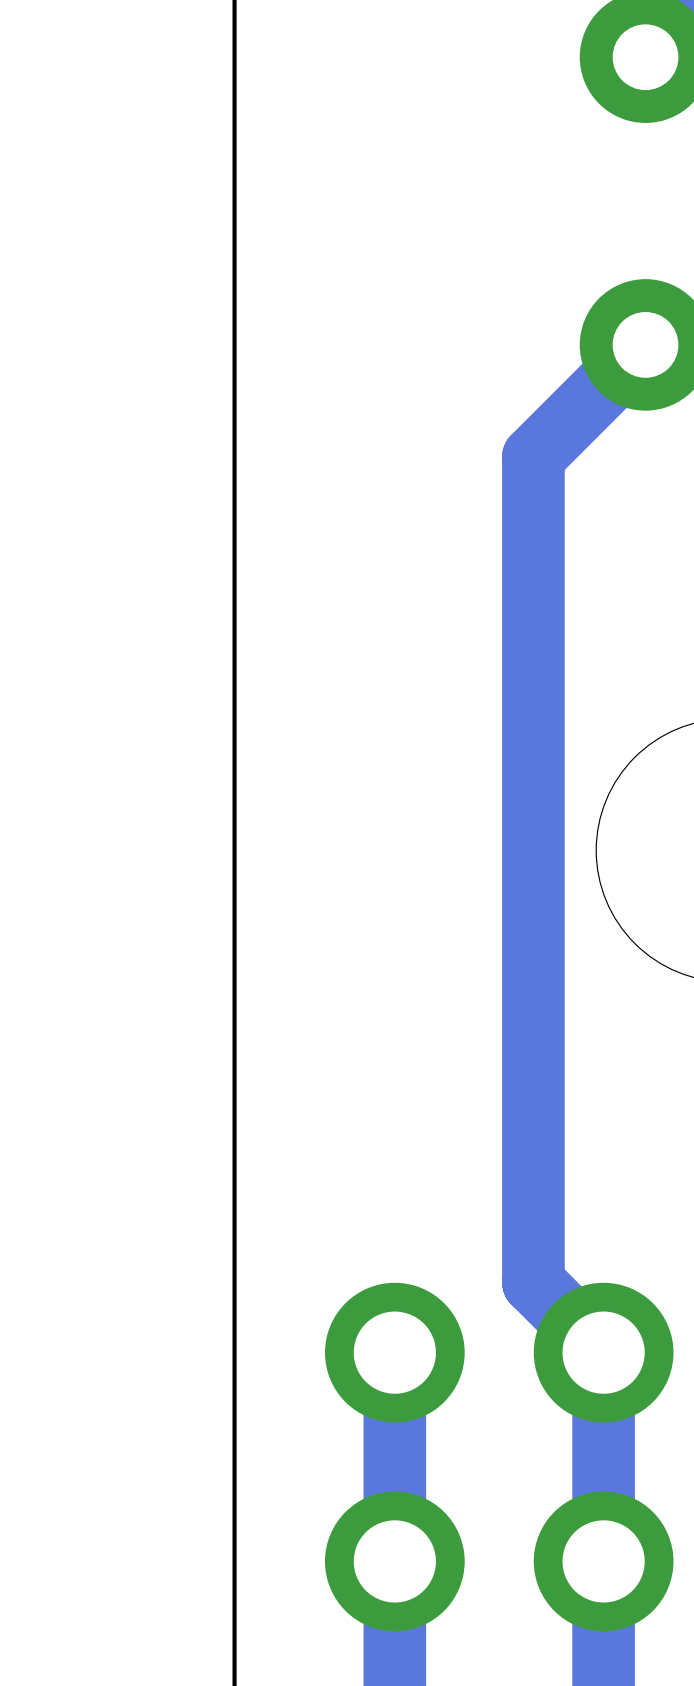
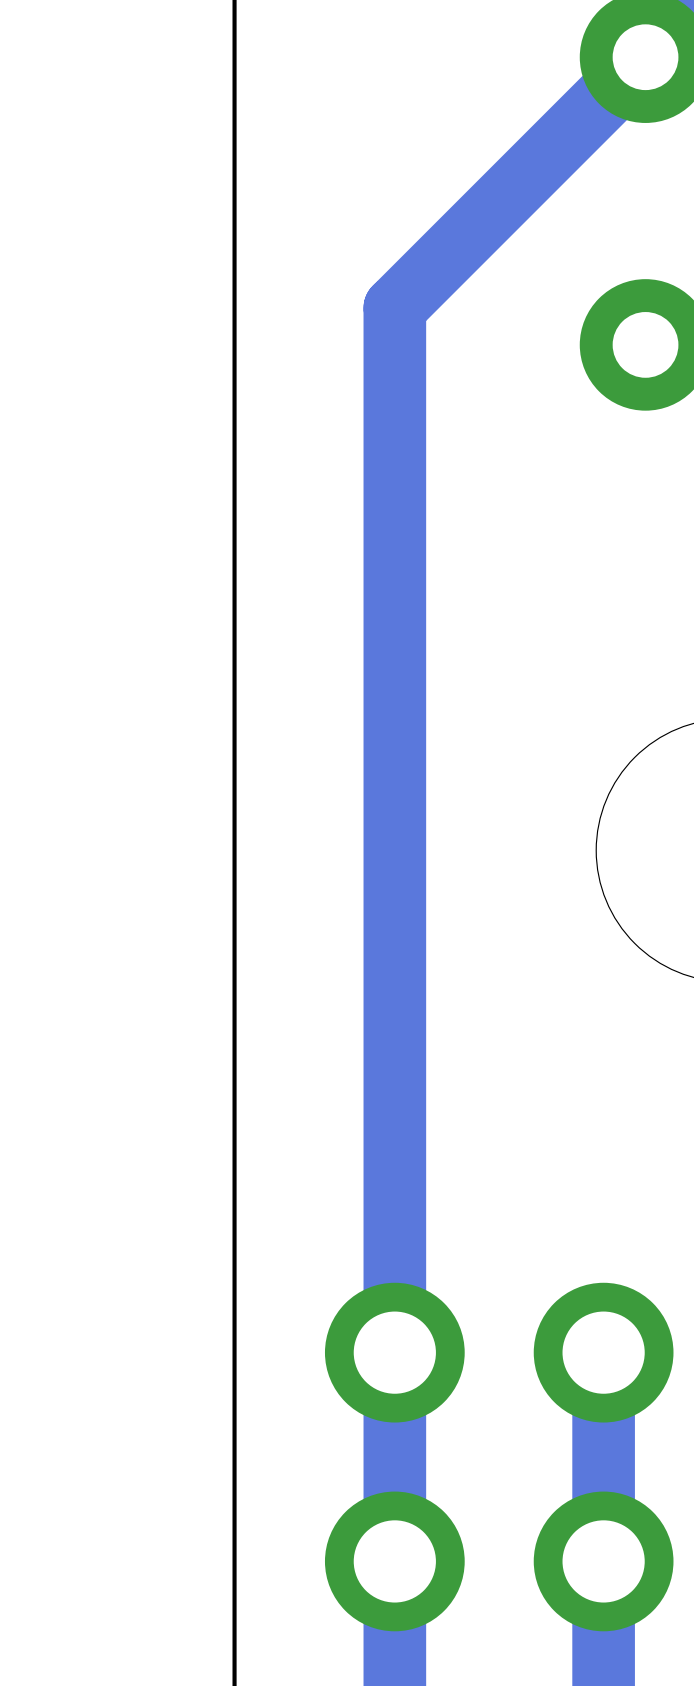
track: none -> (645, 57) (394, 307) (394, 1352)
track: (645, 344) (533, 457) (533, 1282) (603, 1352) -> none

